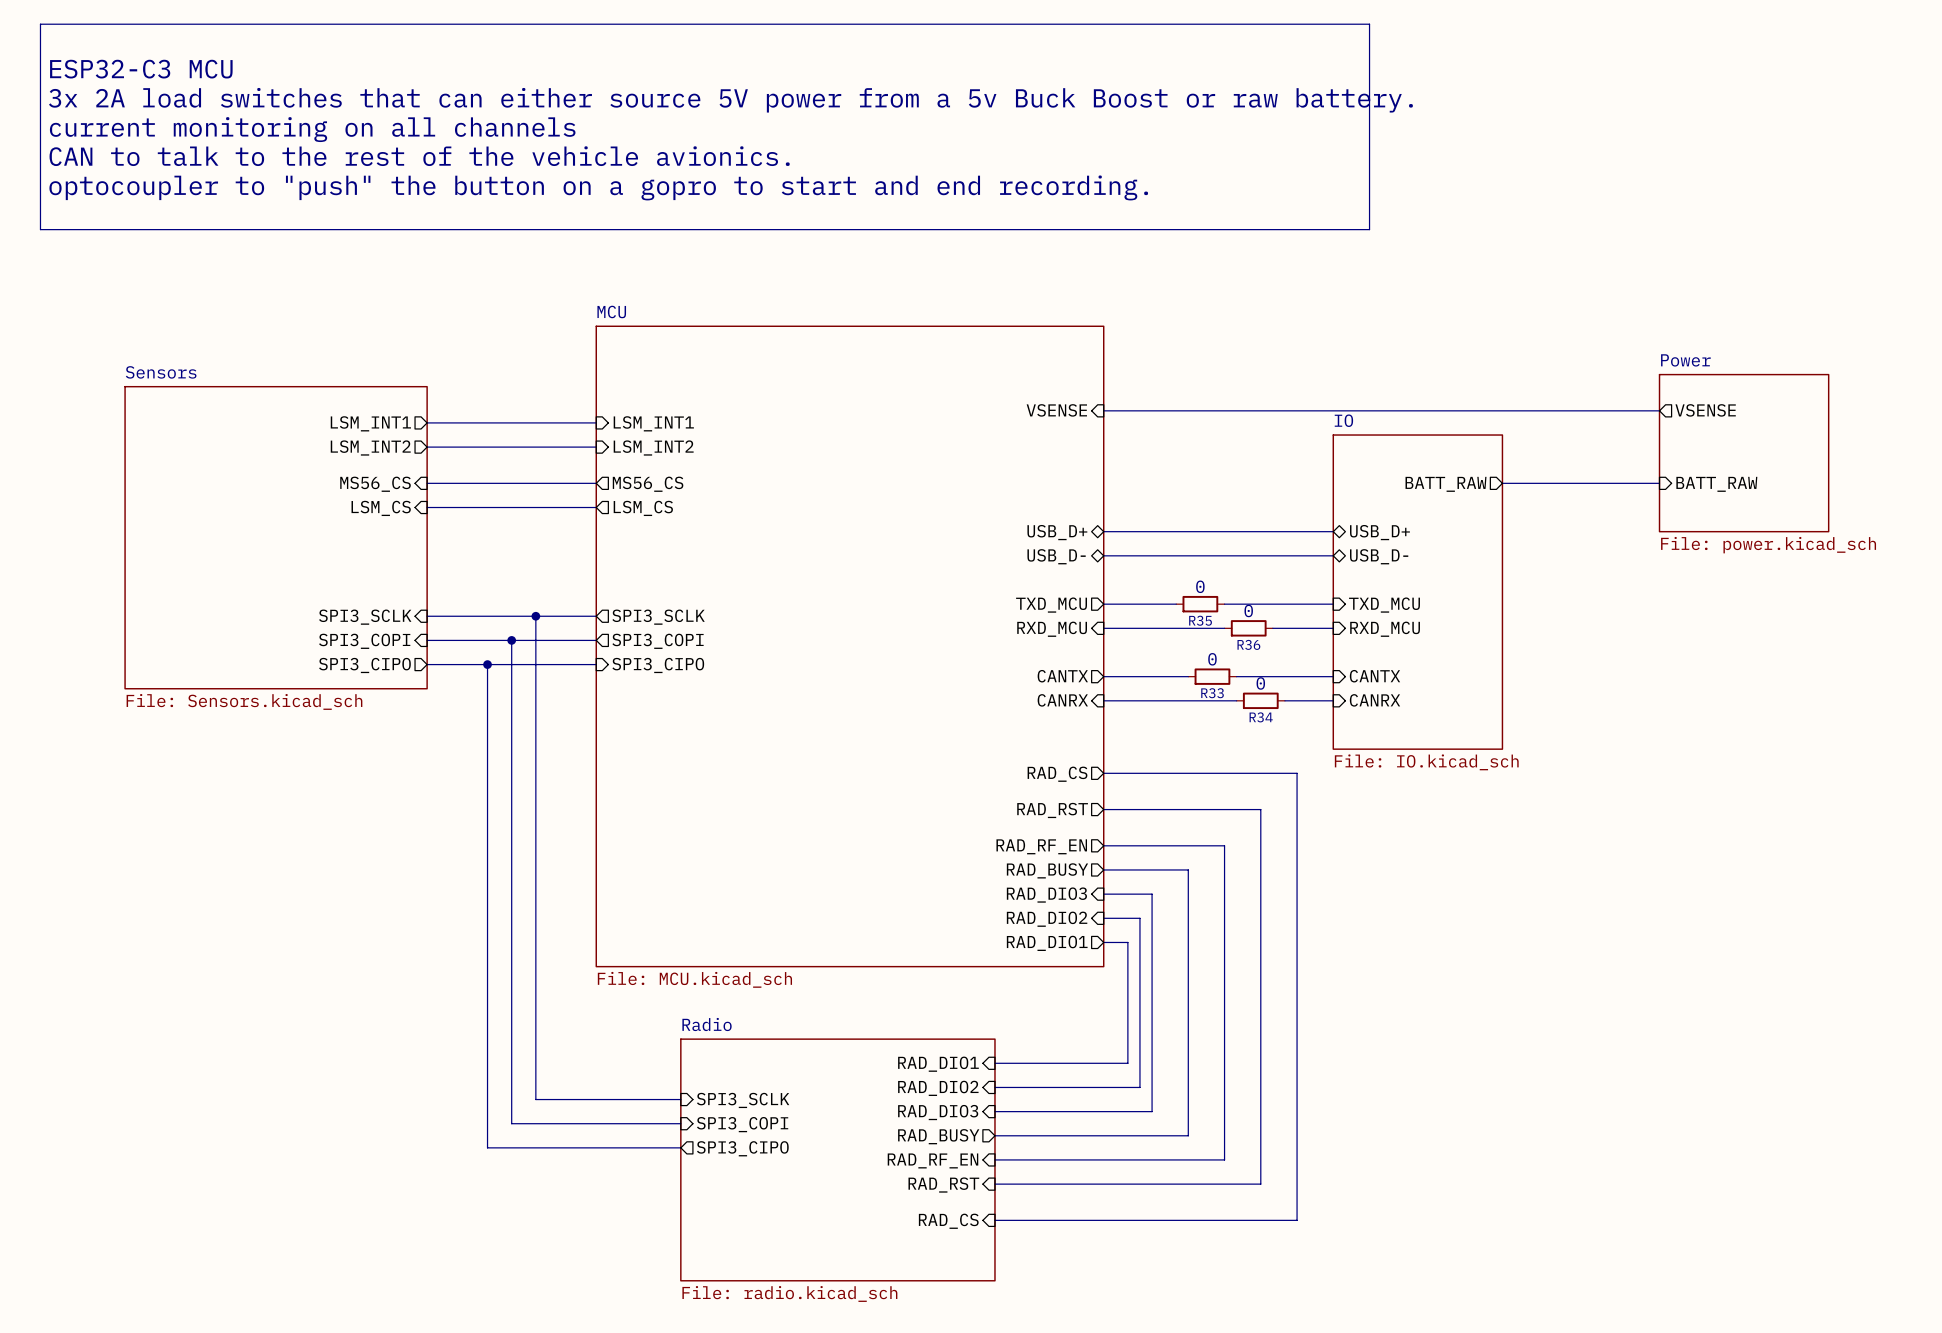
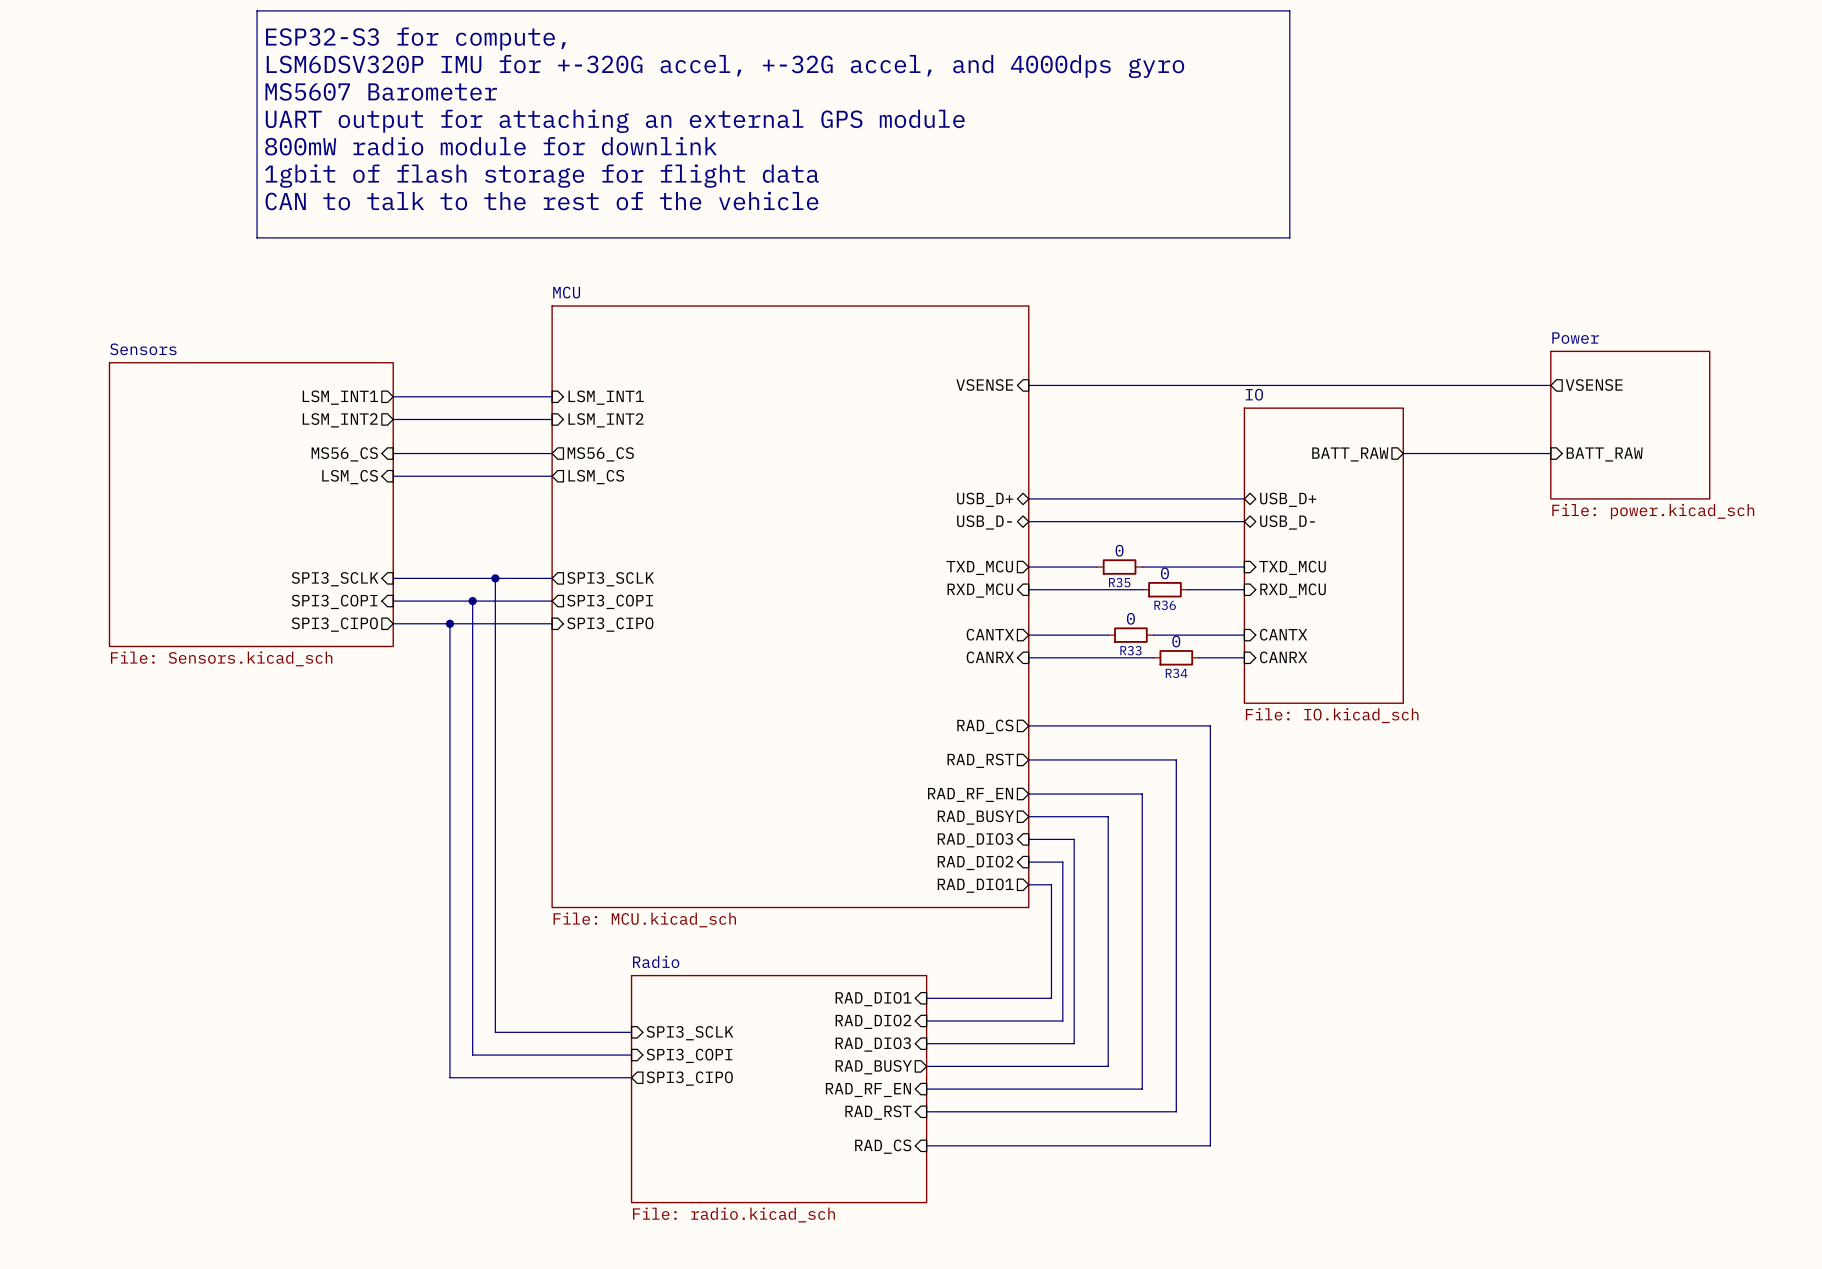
line: (40, 24) (1369, 24) (1369, 229) (40, 229) (40, 24) -> (257, 10) (257, 237) (1289, 237) (1289, 10) (257, 10)
text: none -> ESP32-S3 for compute, (415, 38)
text: ESP32-C3 MCU (141, 69) -> none
text: none -> LSM6DSV320P IMU for +-320G accel, +-32G accel, and 4000dps gyro (725, 66)
text: none -> MS5607 Barometer (381, 91)
text: 3x 2A load switches that can either source 5V power from a 5v Buck Boost or raw battery. (730, 100) -> none
text: current monitoring on all channels (312, 129) -> none
text: none -> UART output for attaching an external GPS module (615, 121)
text: CAN to talk to the rest of the vehicle avionics. (419, 156) -> none
text: none -> 800mW radio module for downlink (491, 146)
text: none -> 1gbit of flash storage for flight data (541, 176)
text: optocoupler to "push" the button on a gopro to start and end recording. (598, 187) -> none
text: none -> CAN to talk to the rest of the vehicle (541, 201)

